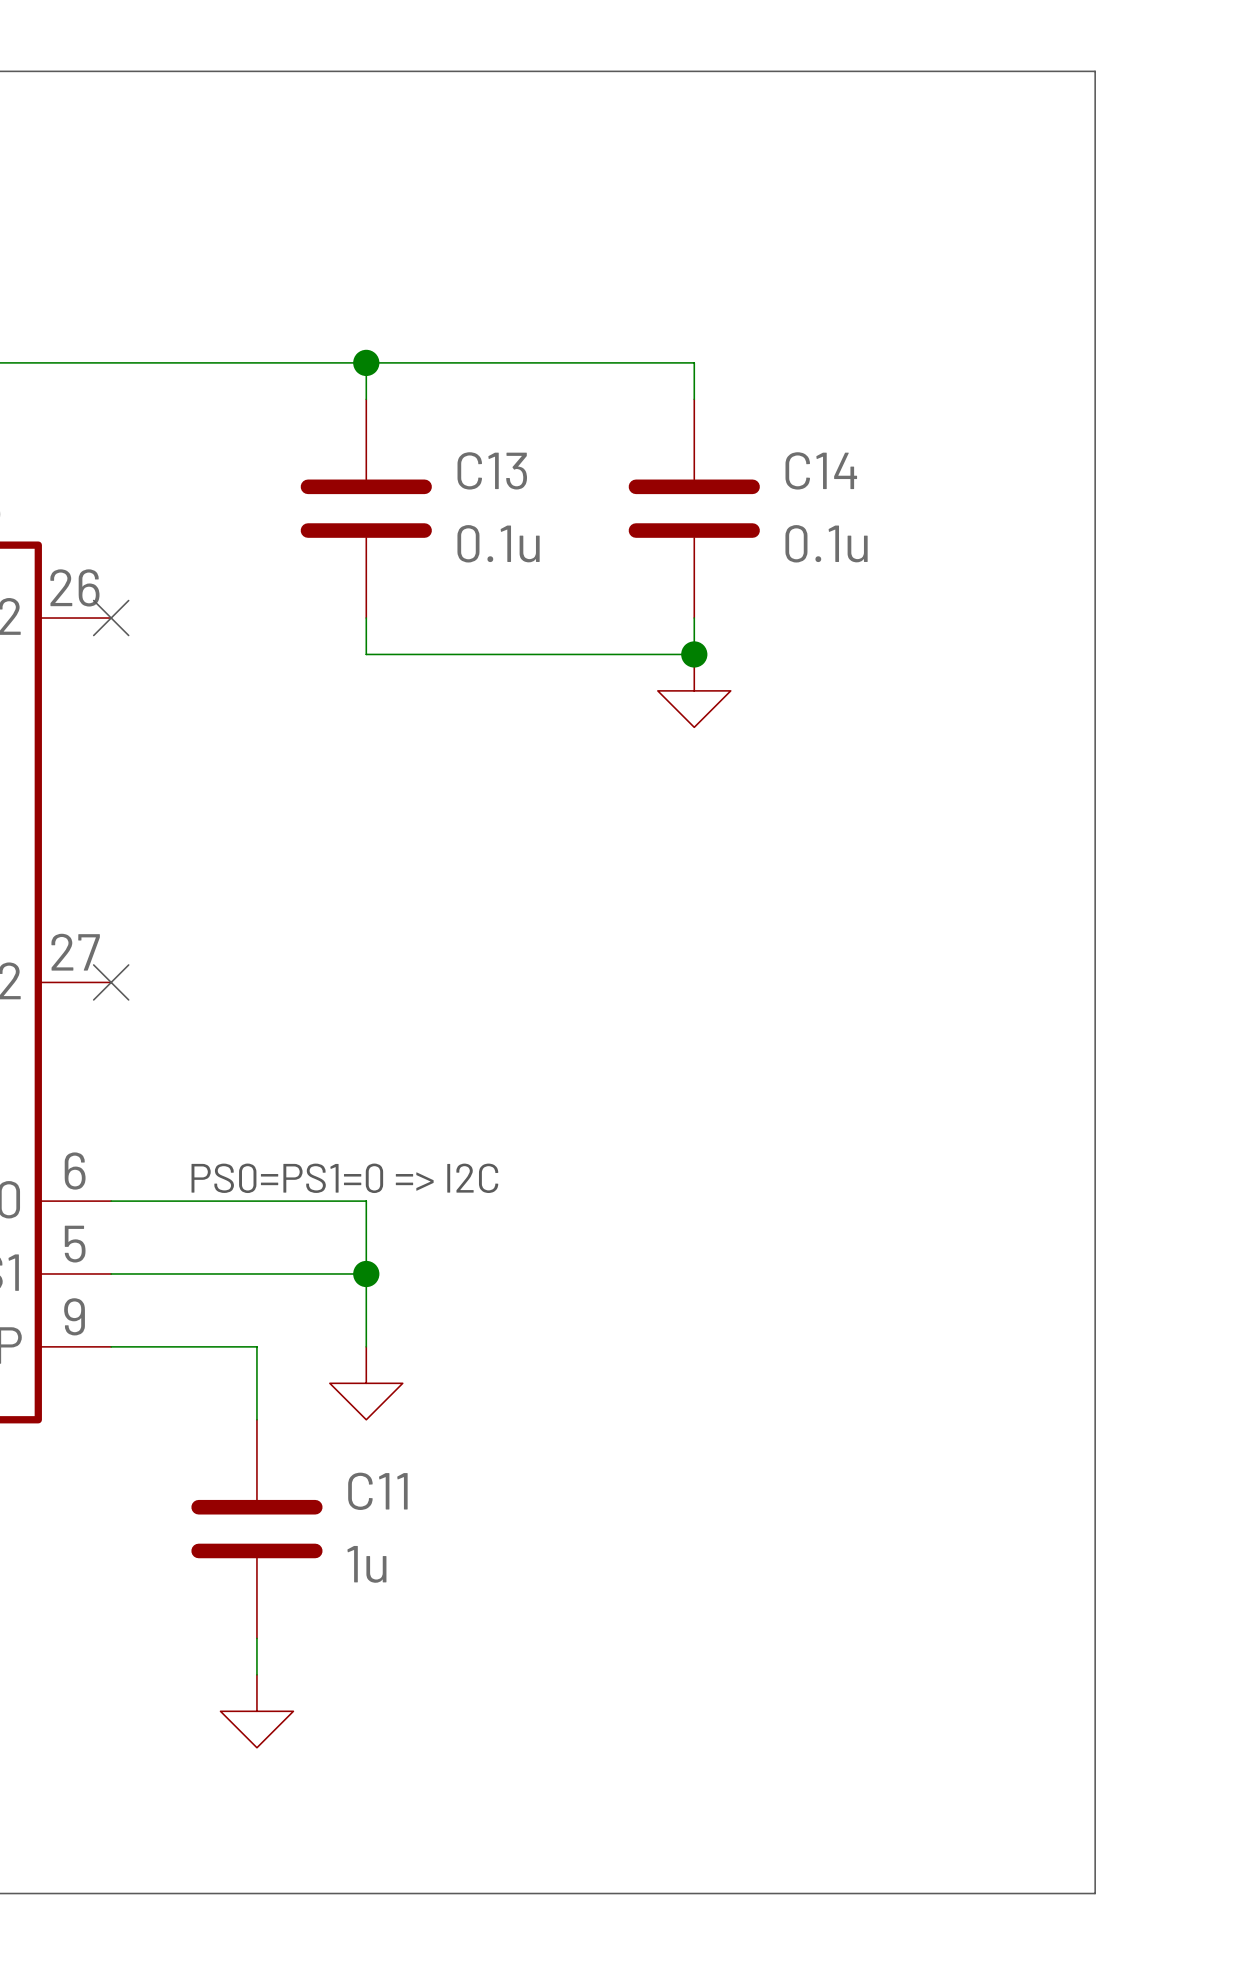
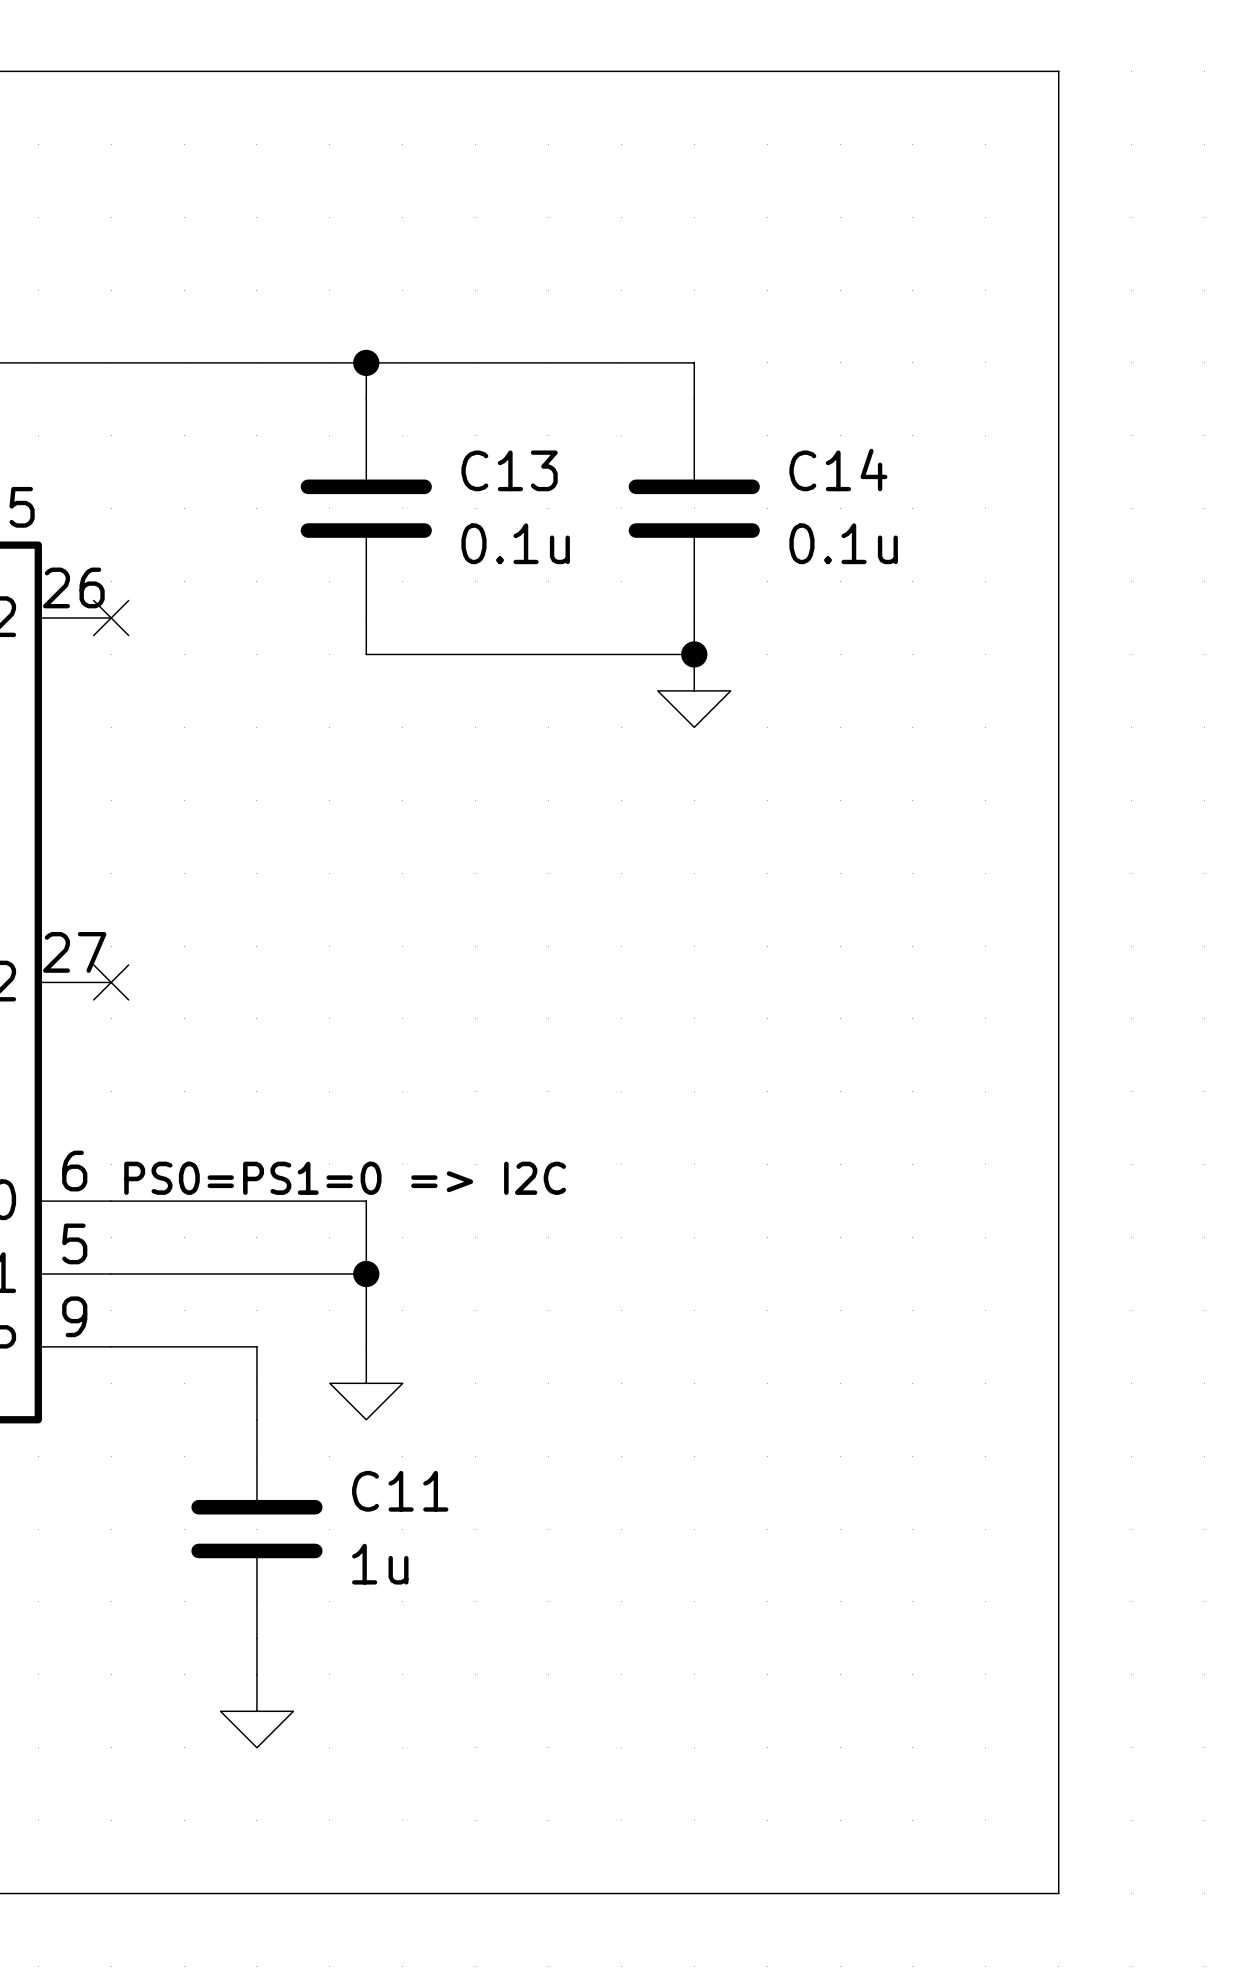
line: (1058, 71) (1095, 71) (1095, 1893) (1058, 1893) -> (1058, 71) (1058, 1893)

